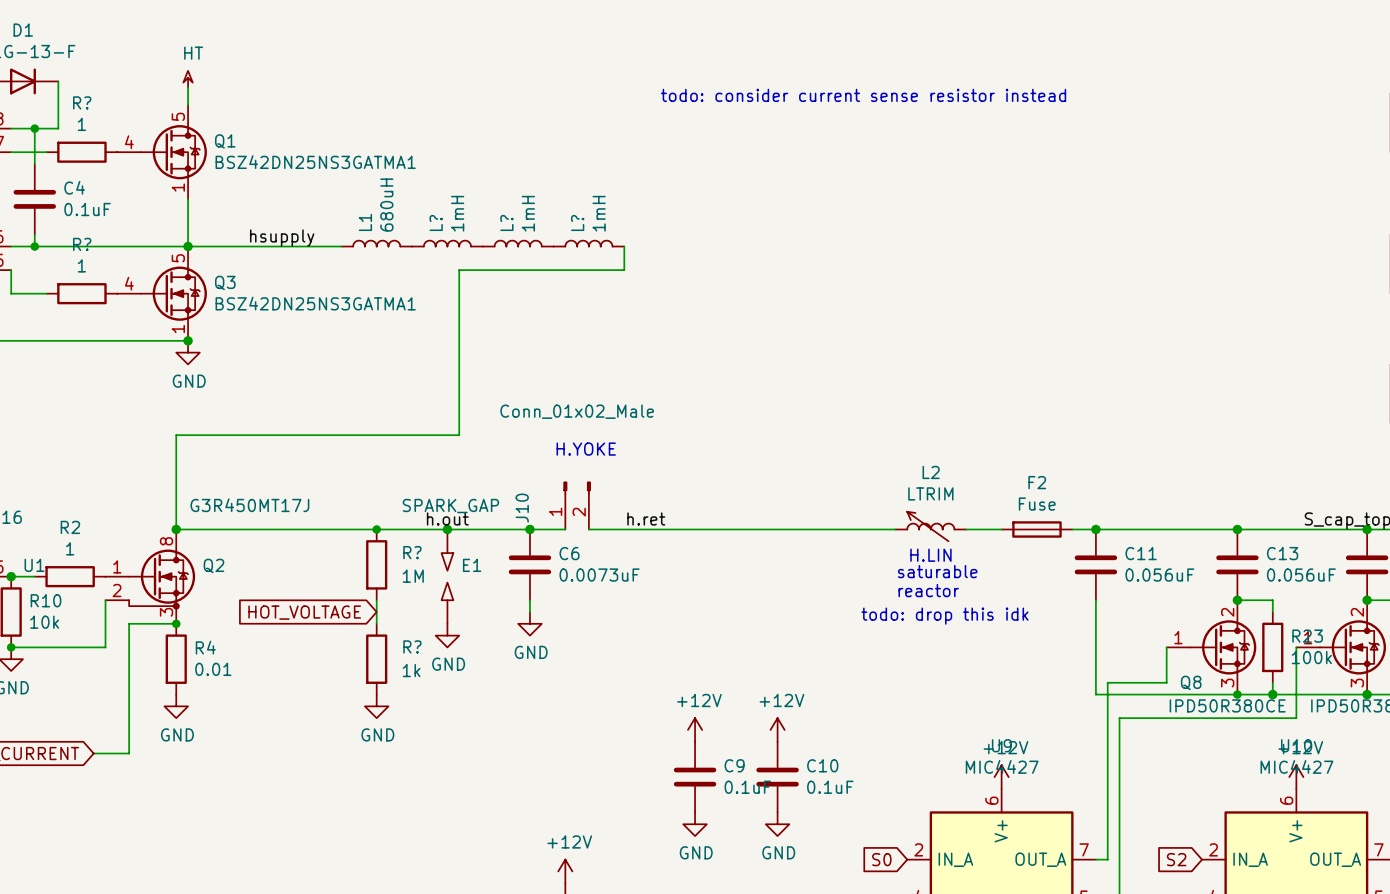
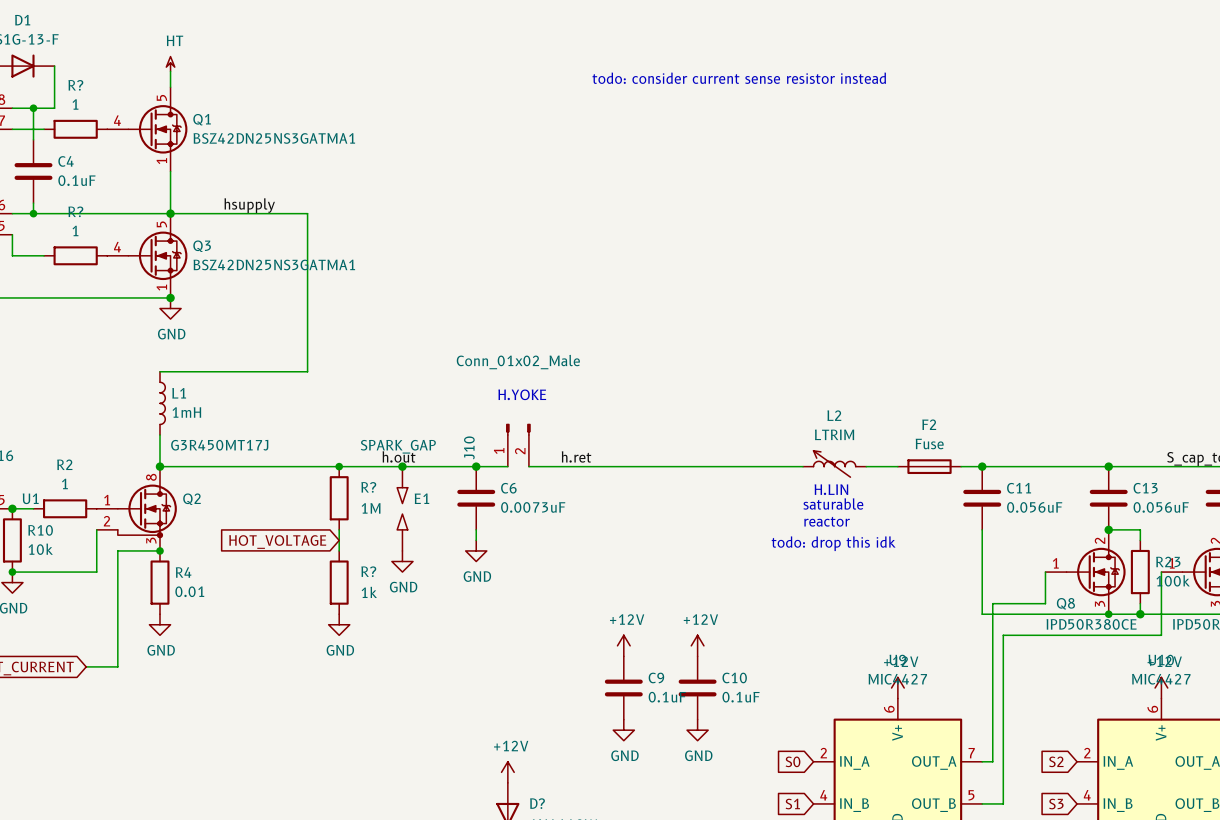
L1 value: 680uH (386, 205) -> 1mH (186, 412)
L1 rotation: 0° (376, 243) -> 90° clockwise (162, 403)
L1 position: (376, 243) -> (162, 403)
L?: 1mH (447, 243) -> none
L?: 1mH (518, 243) -> none
L?: 1mH (588, 243) -> none
wire: none -> (307, 213) (307, 371) (159, 371)
wire: (624, 246) (624, 270) (459, 270) (459, 435) (176, 435) (176, 494) -> none

